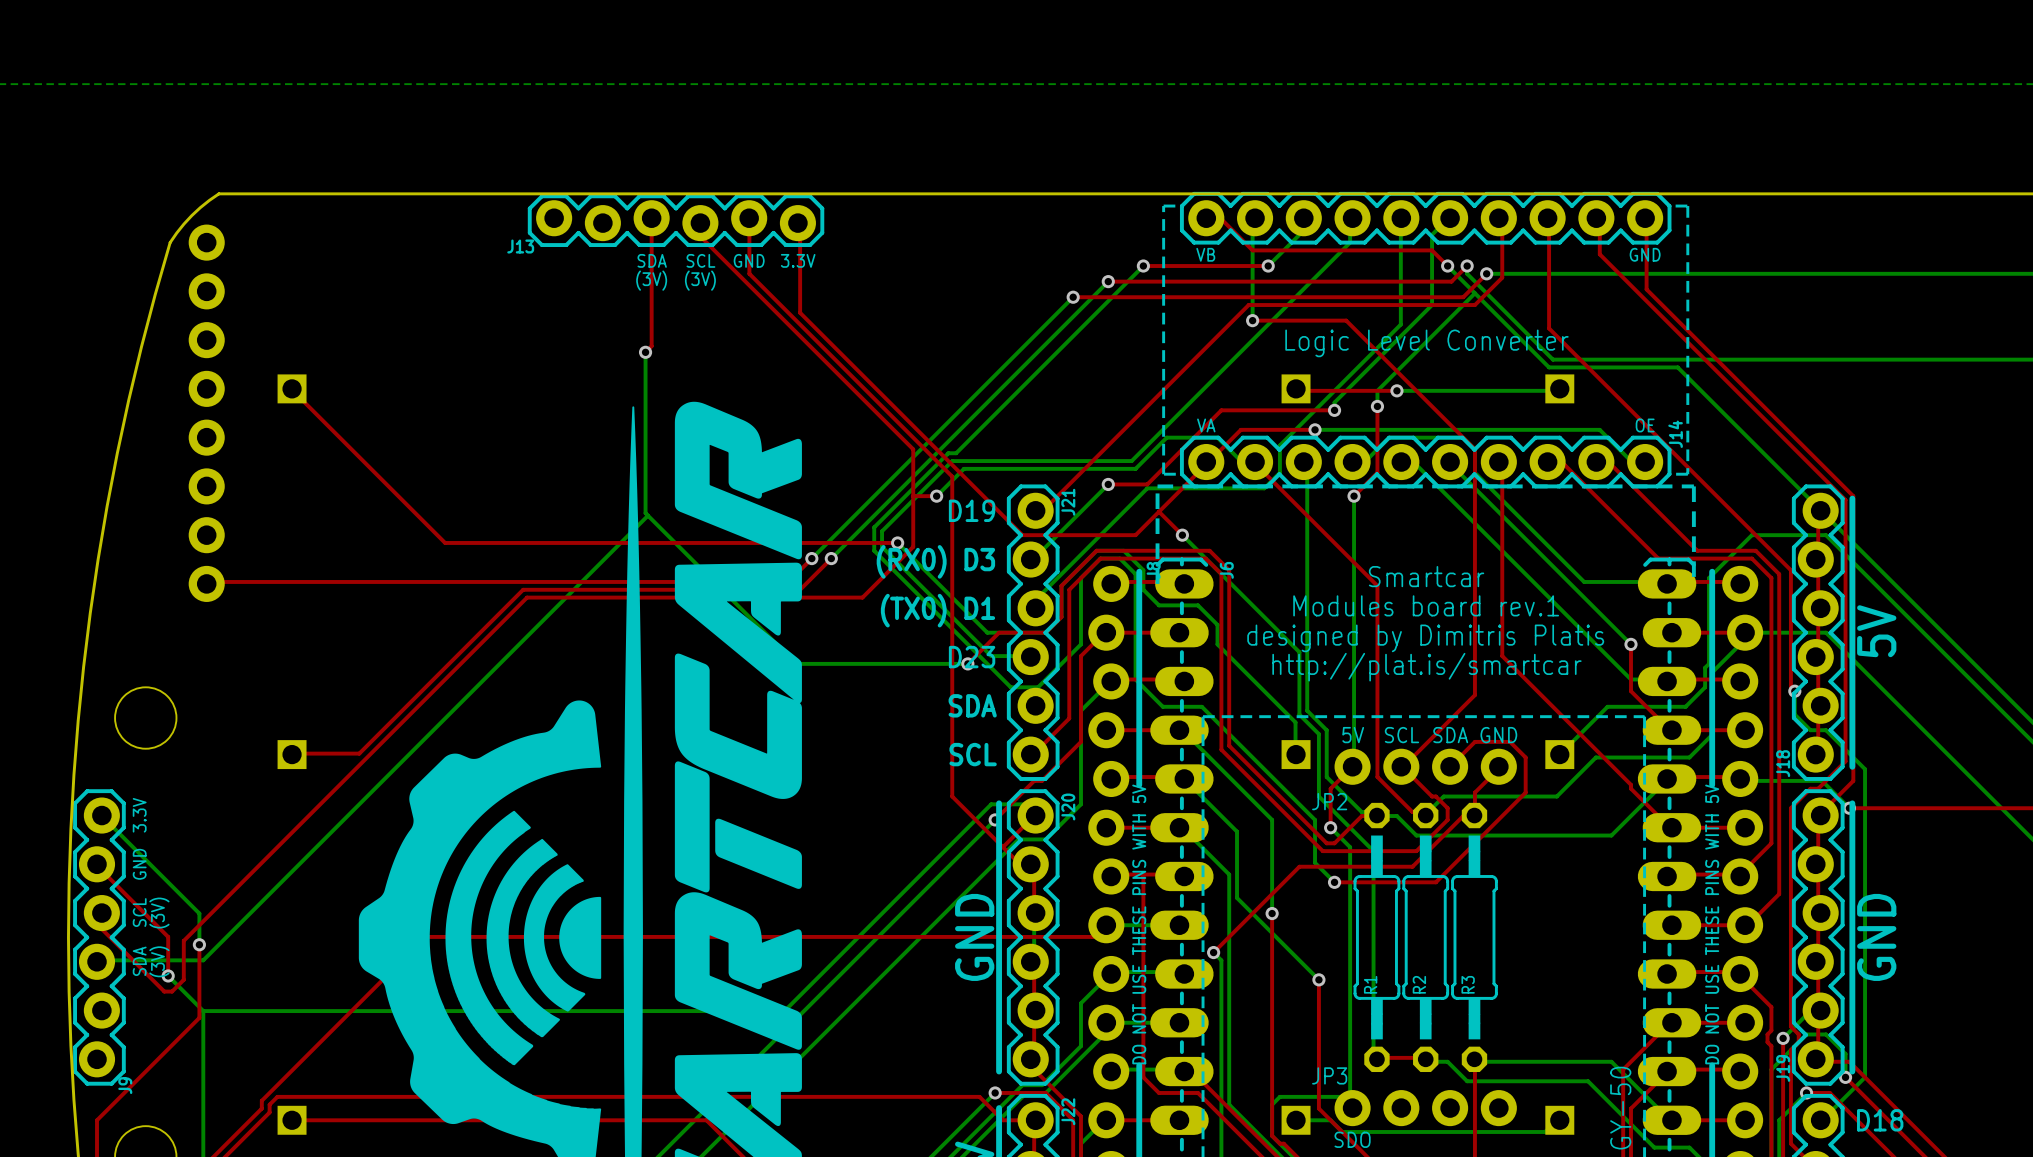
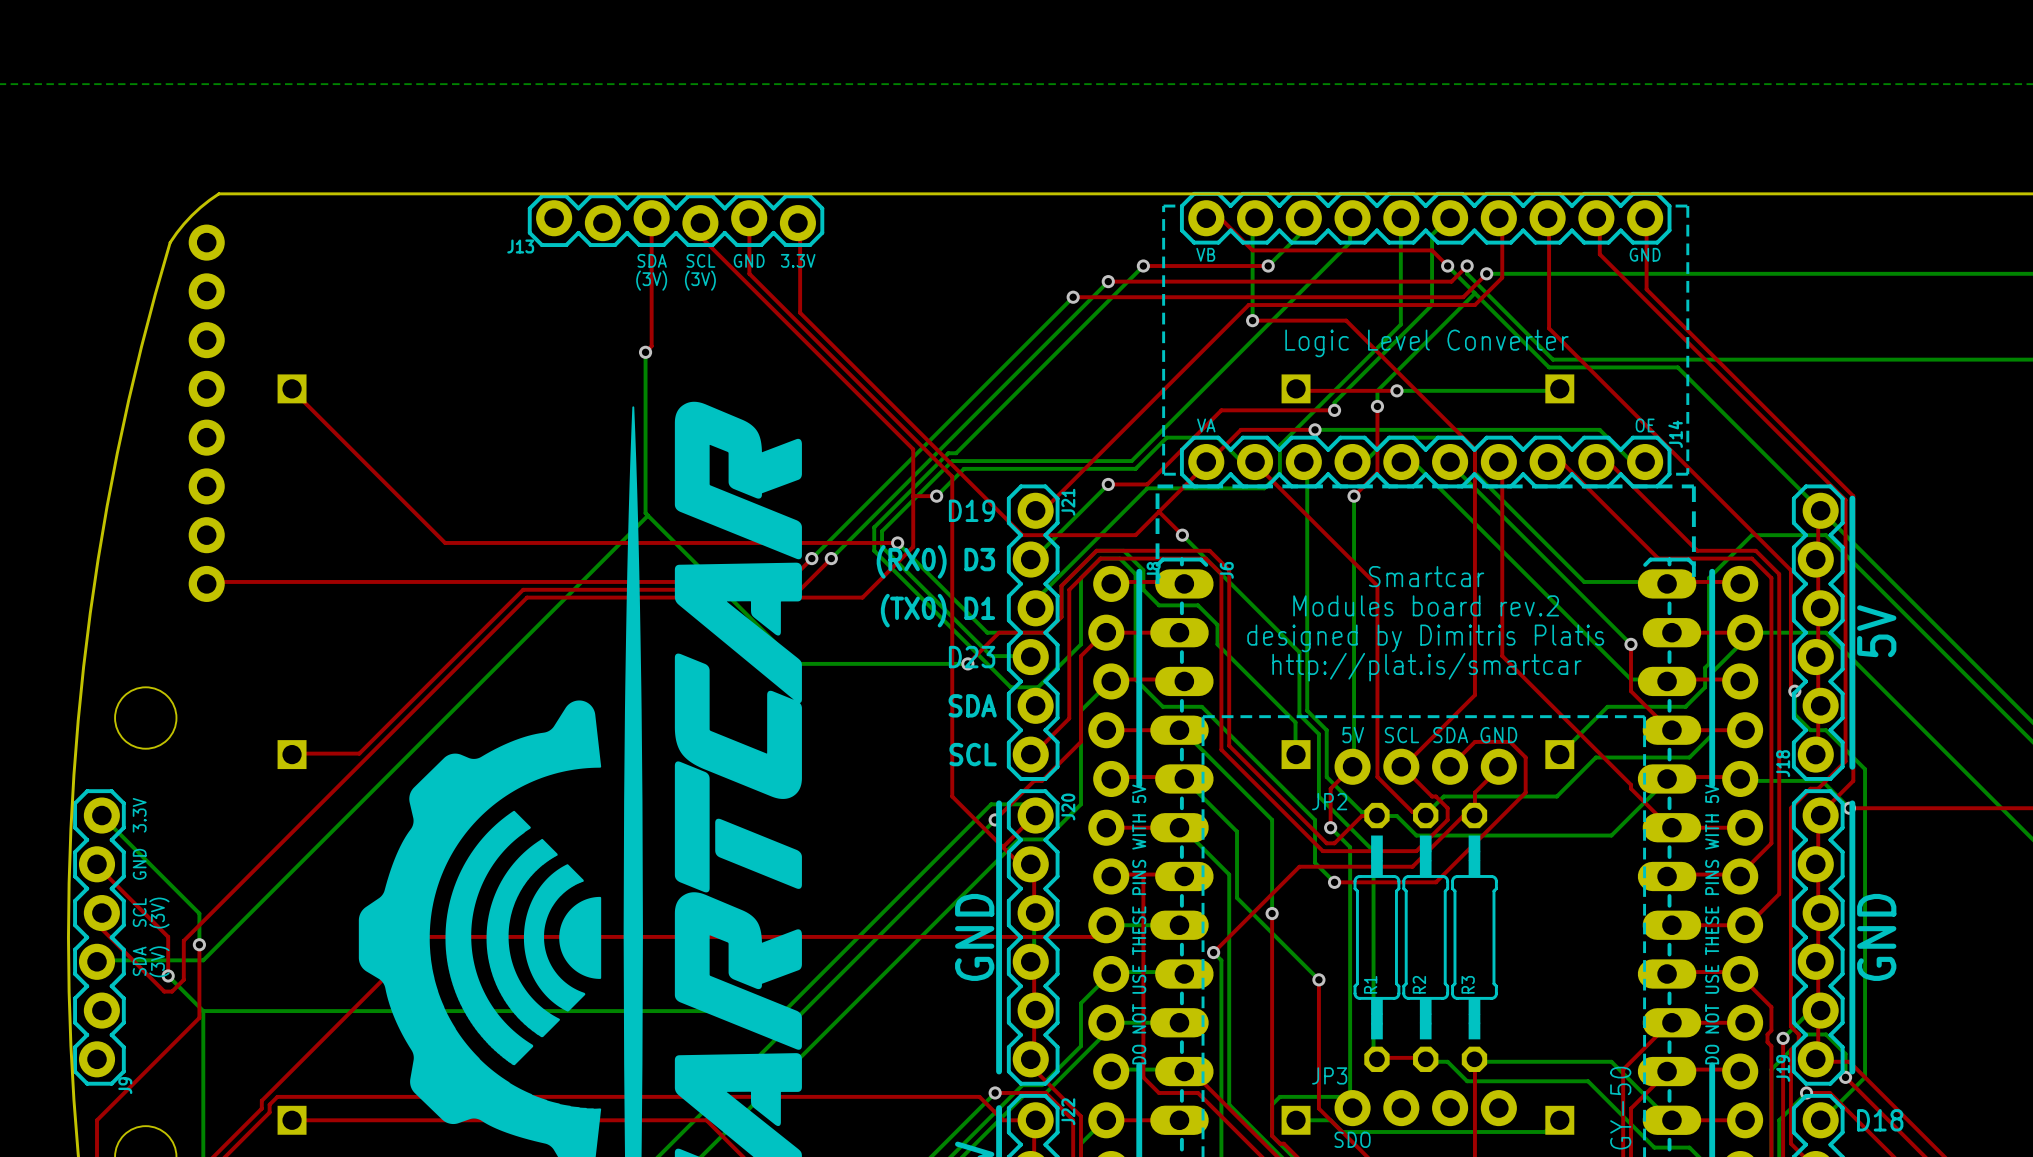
text: Modules board rev.1 (1426, 605) -> Modules board rev.2 (1426, 605)

